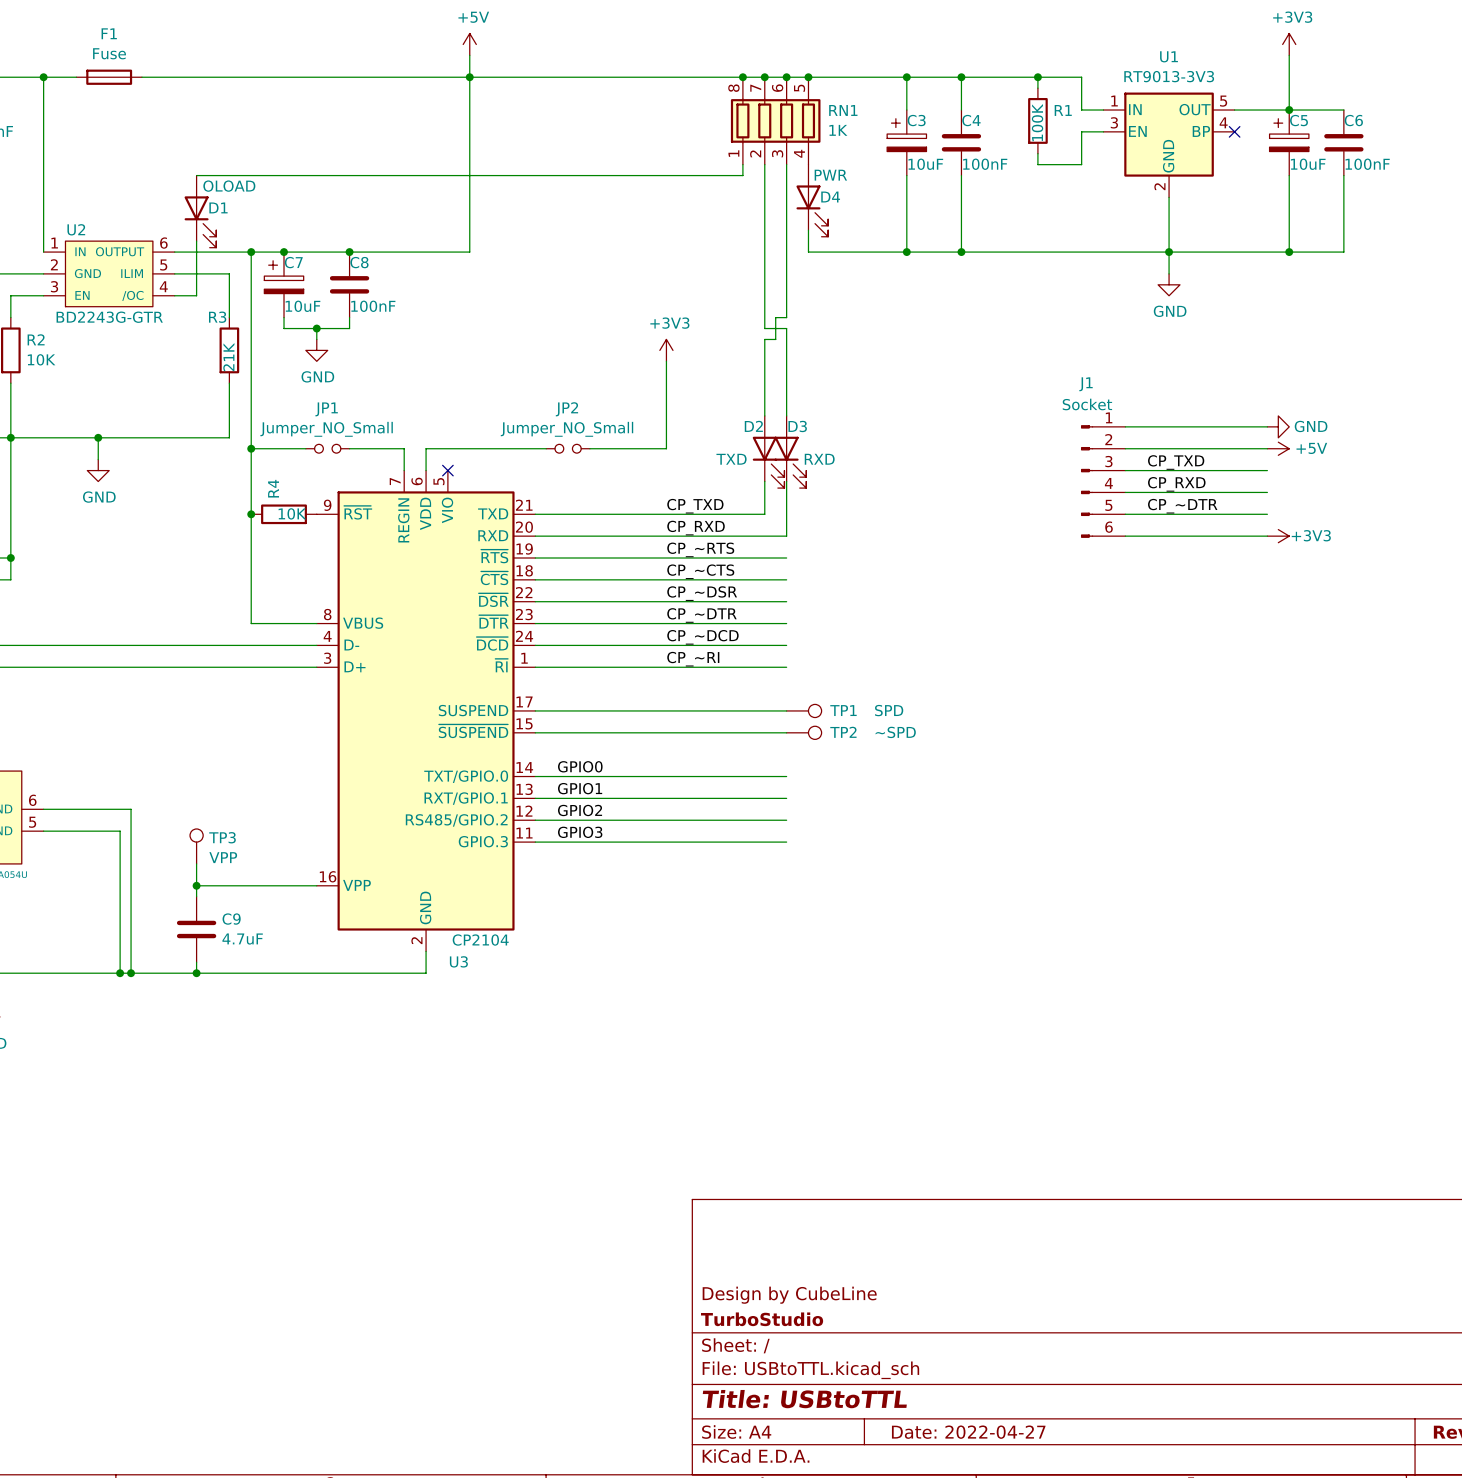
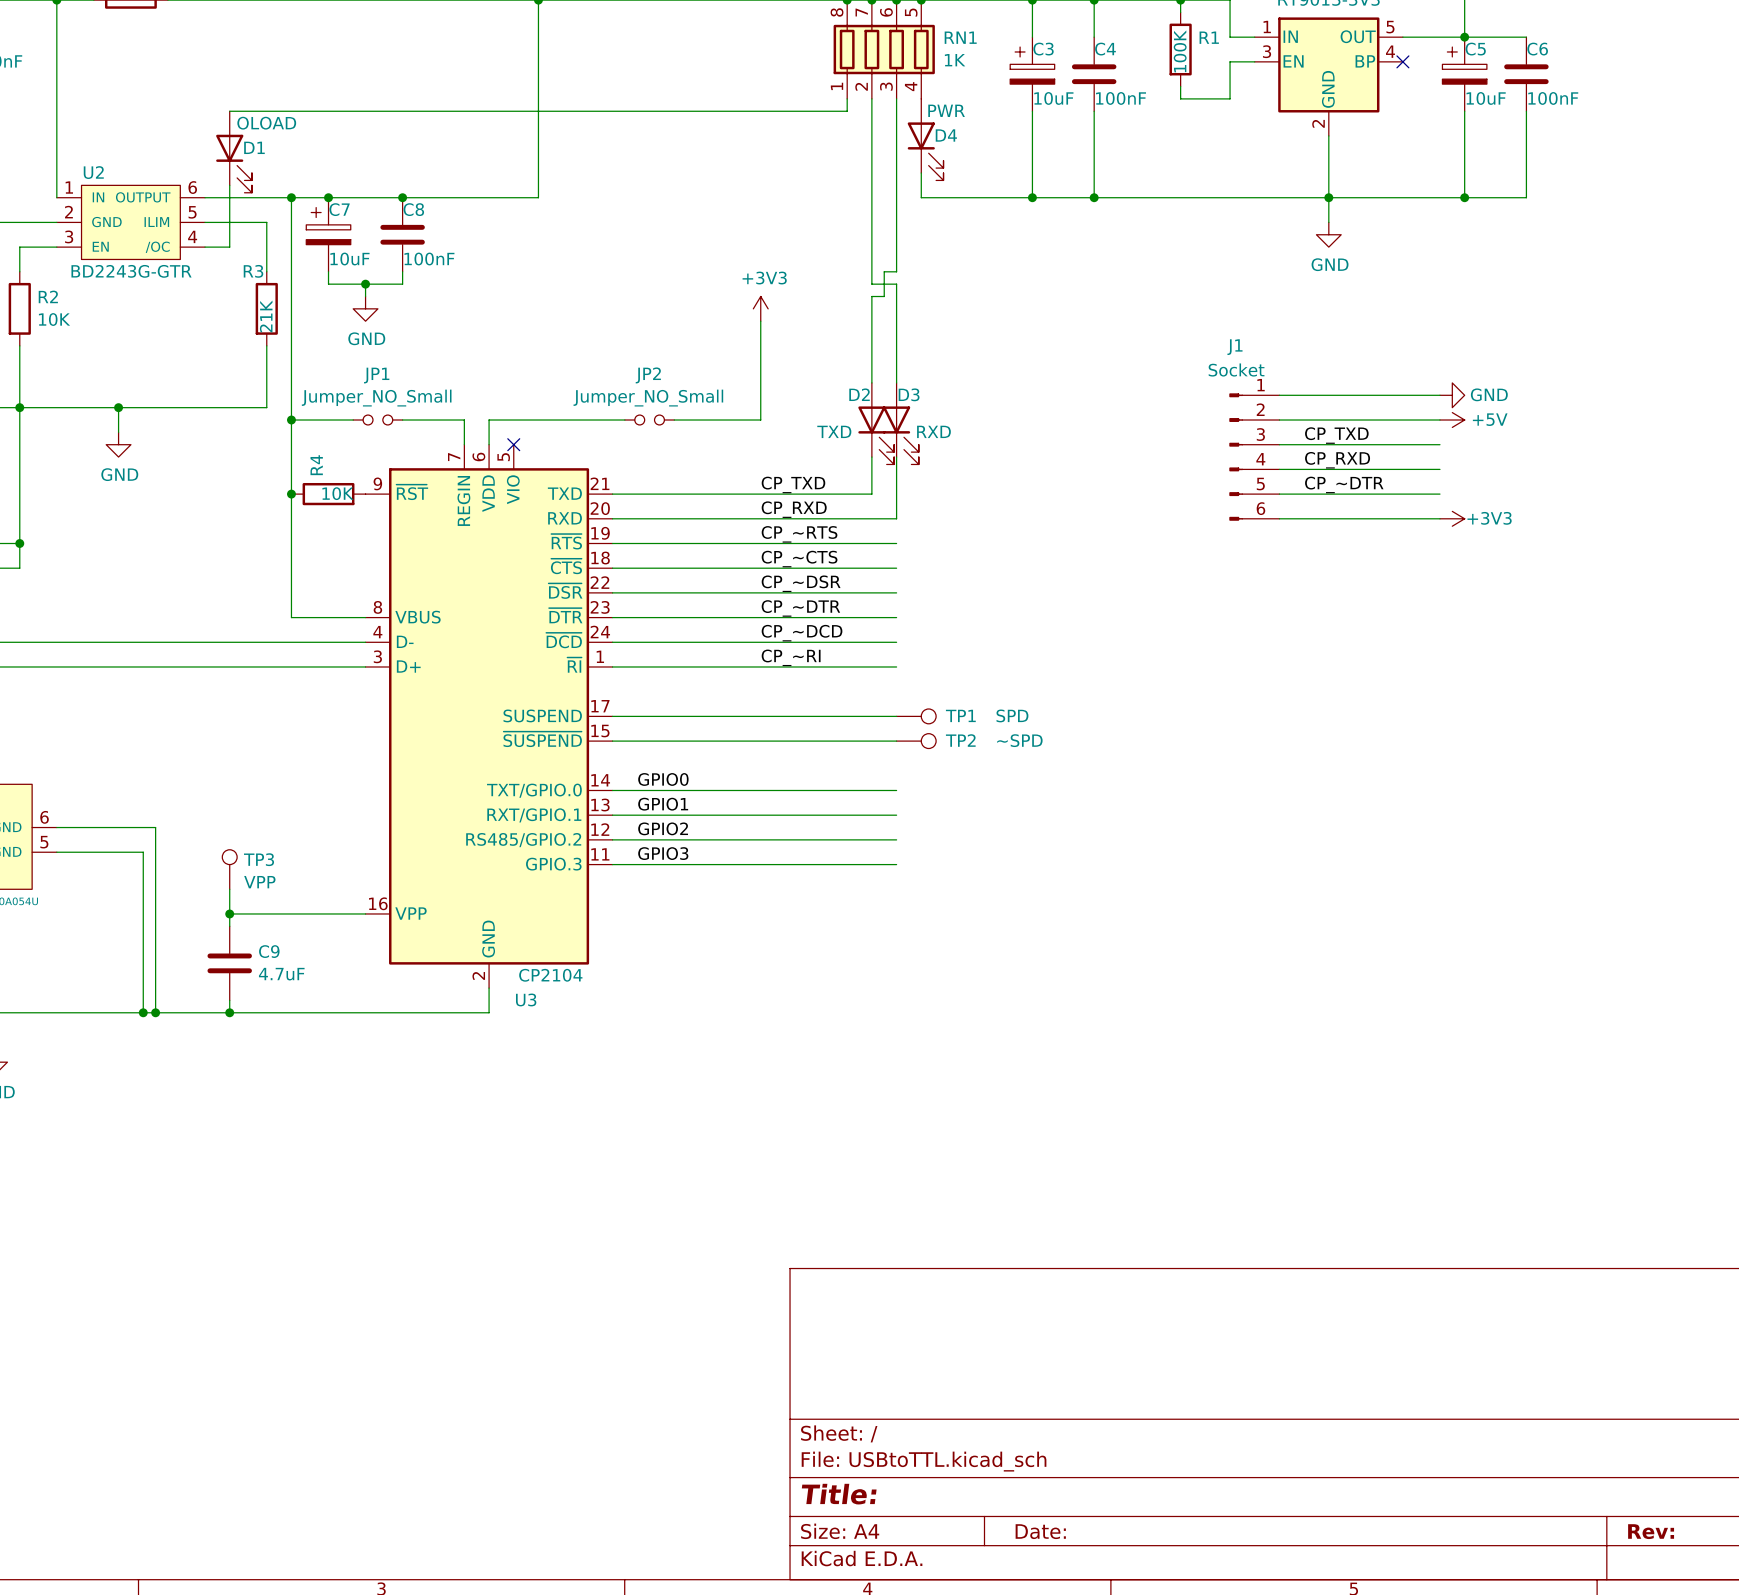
title block: Design by CubeLine (789, 1295) -> none
title block: TurboStudio (762, 1319) -> none
title block: Title: USBtoTTL (804, 1399) -> Title: (839, 1494)
title block: Date: 2022-04-27 (968, 1432) -> Date: (1040, 1531)

